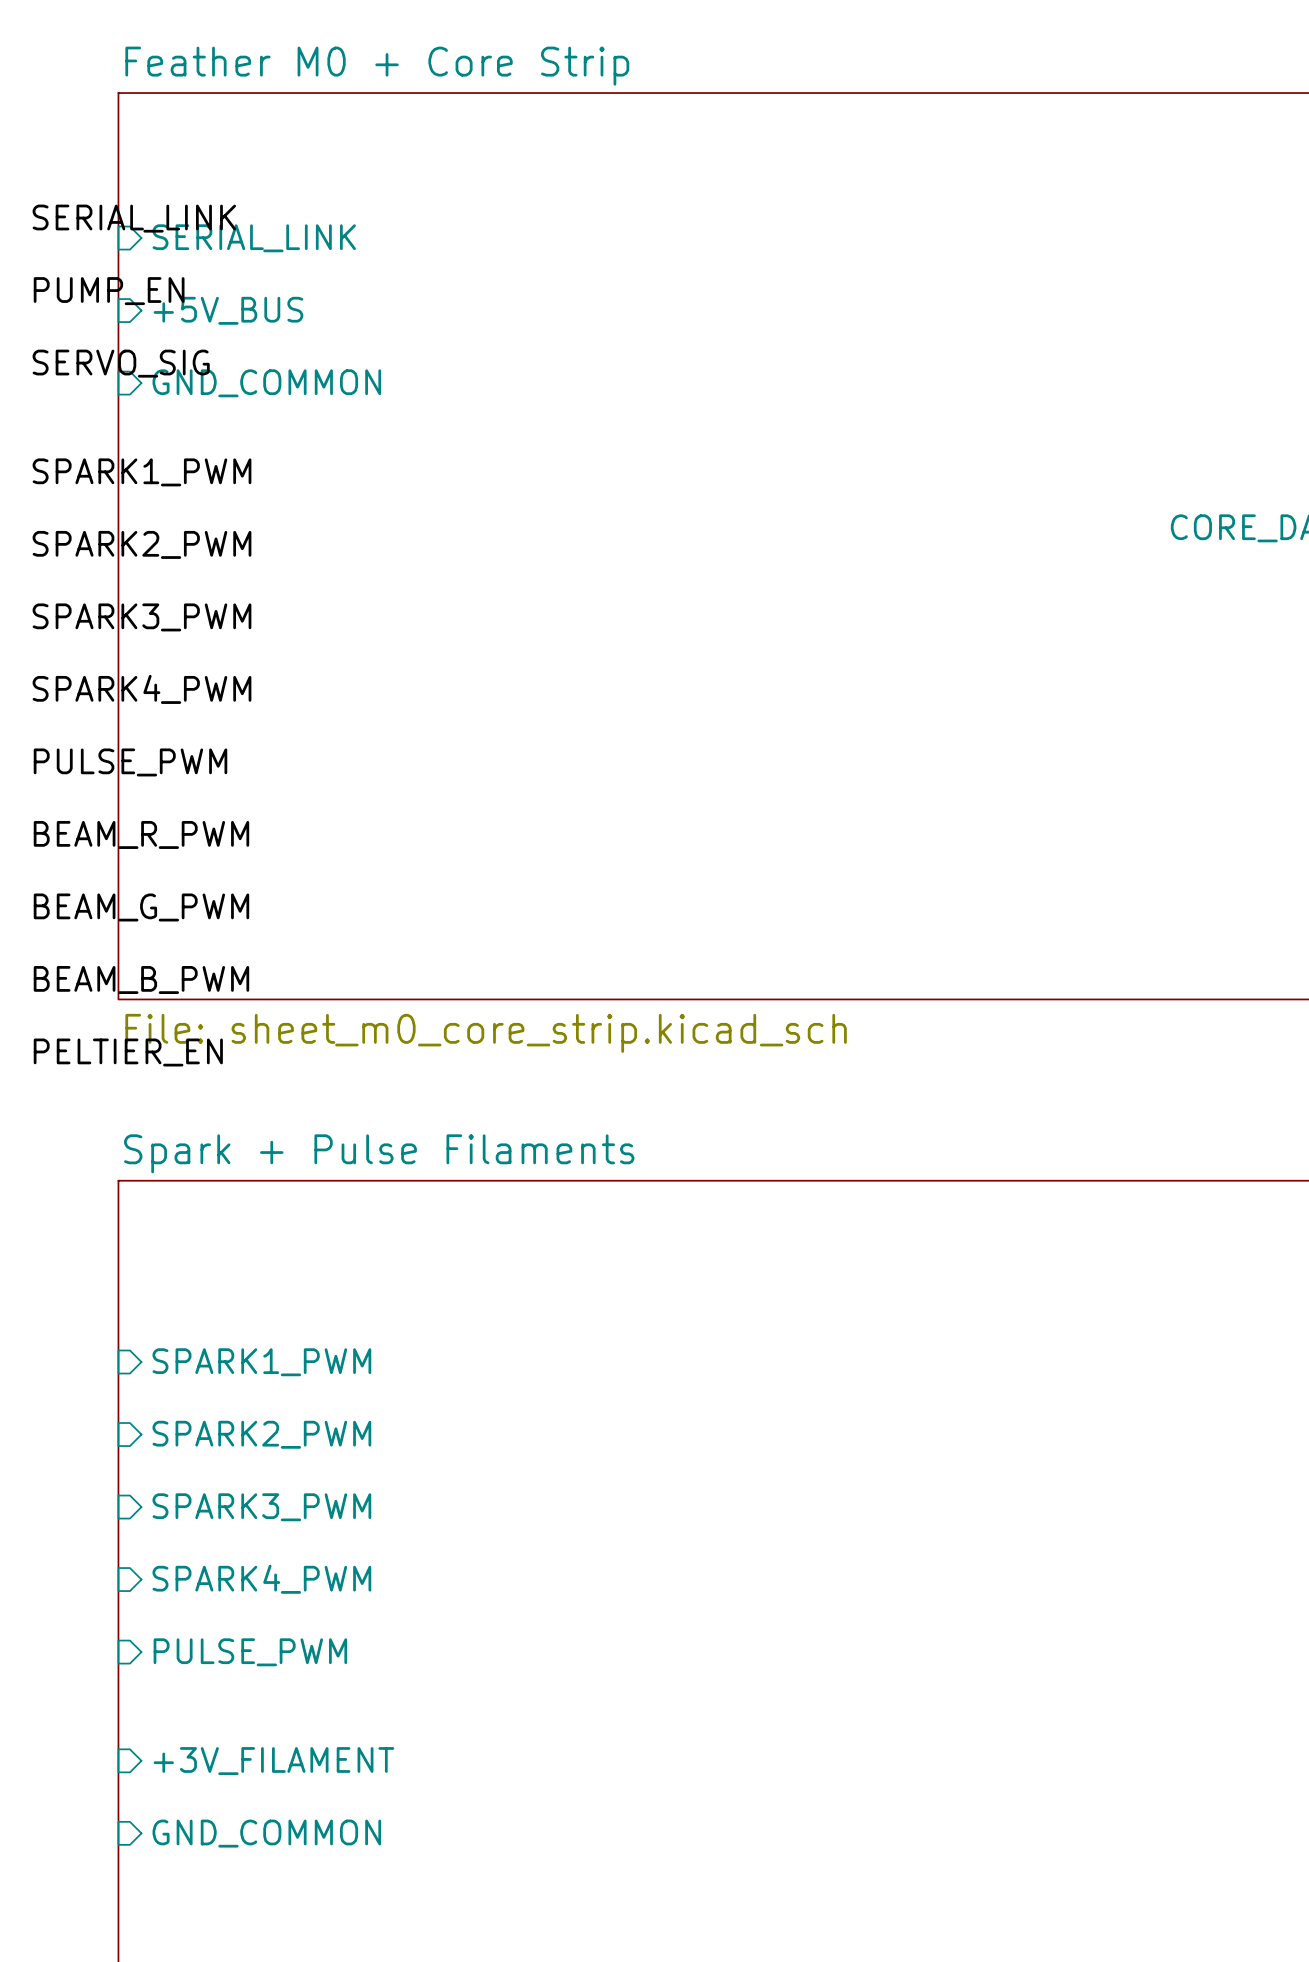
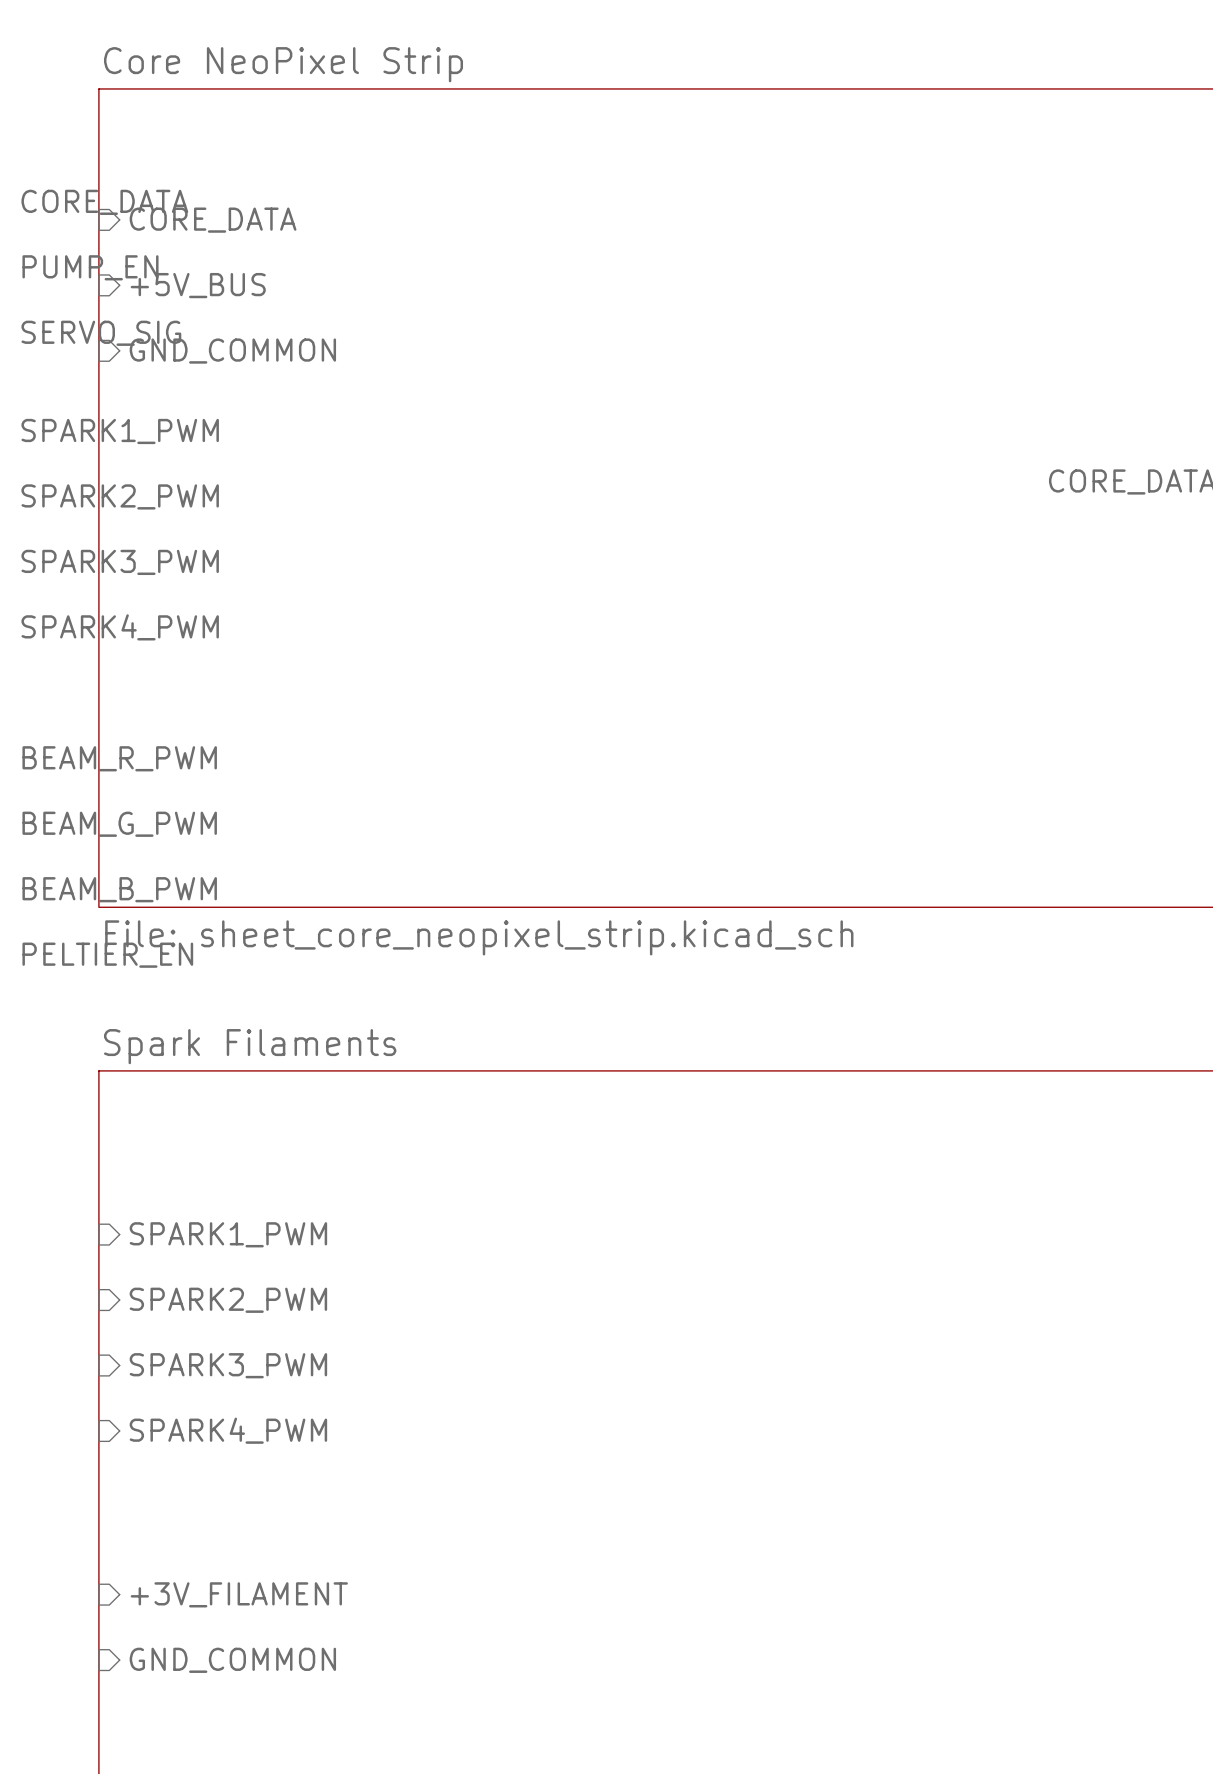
sheet Feather M0 + Core Strip name: Feather M0 + Core Strip (377, 66) -> Core NeoPixel Strip (283, 64)
label: SERIAL_LINK (134, 218) -> CORE_DATA (104, 202)
sheet pin: SERIAL_LINK (254, 238) -> CORE_DATA (213, 220)
label: PULSE_PWM (130, 762) -> none
sheet Feather M0 + Core Strip value: File: sheet_m0_core_strip.kicad_sch (486, 1033) -> File: sheet_core_neopixel_strip.kicad_sch (479, 937)
sheet Spark + Pulse Filaments name: Spark + Pulse Filaments (379, 1153) -> Spark Filaments (250, 1046)
sheet pin: PULSE_PWM (250, 1652) -> none

